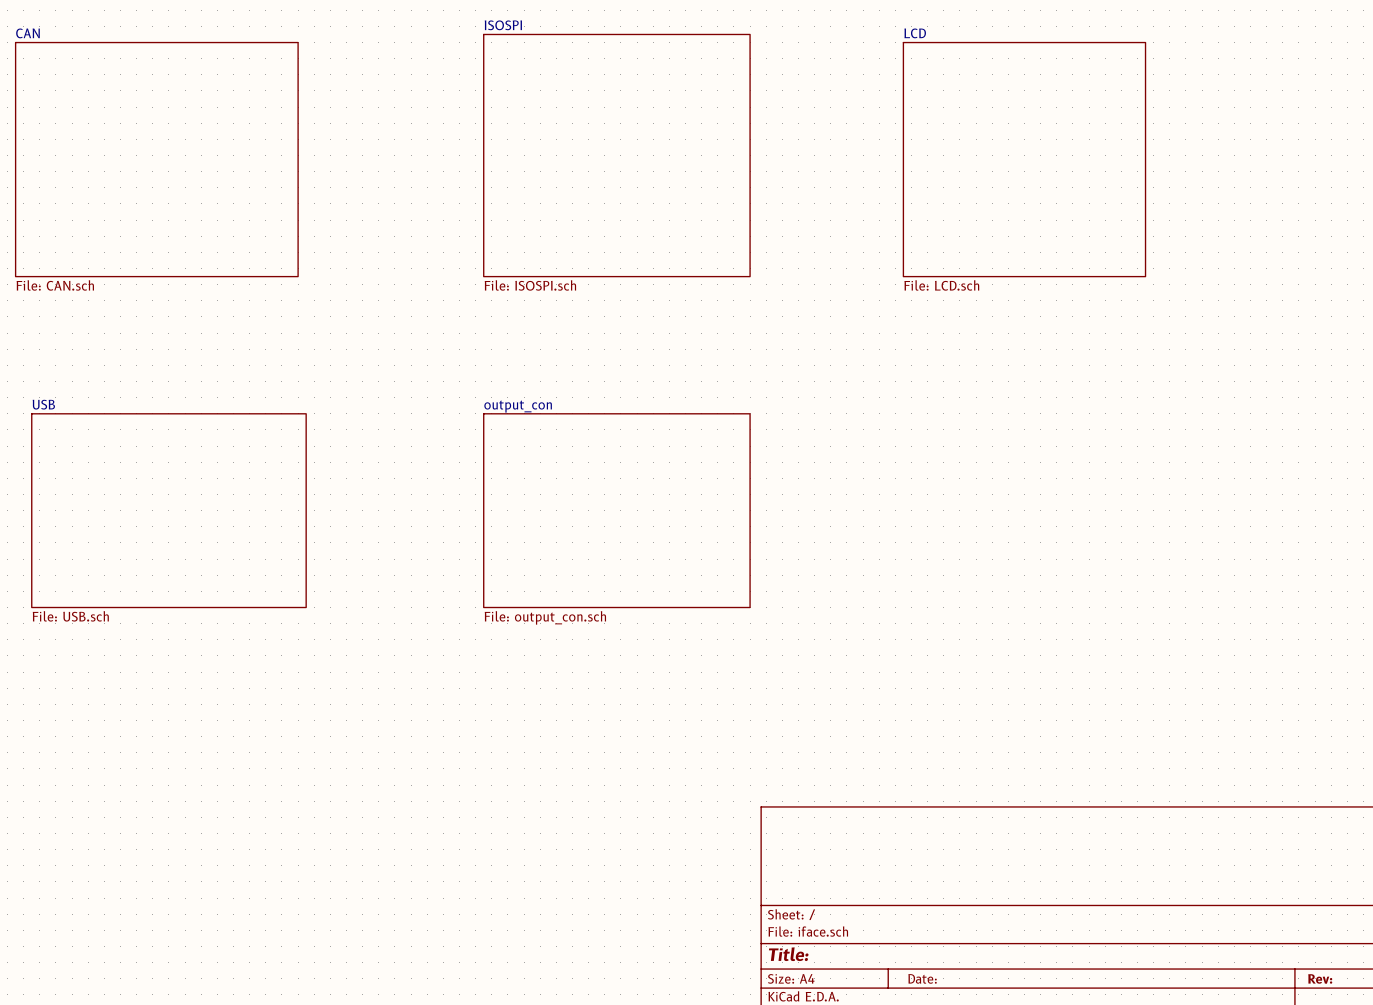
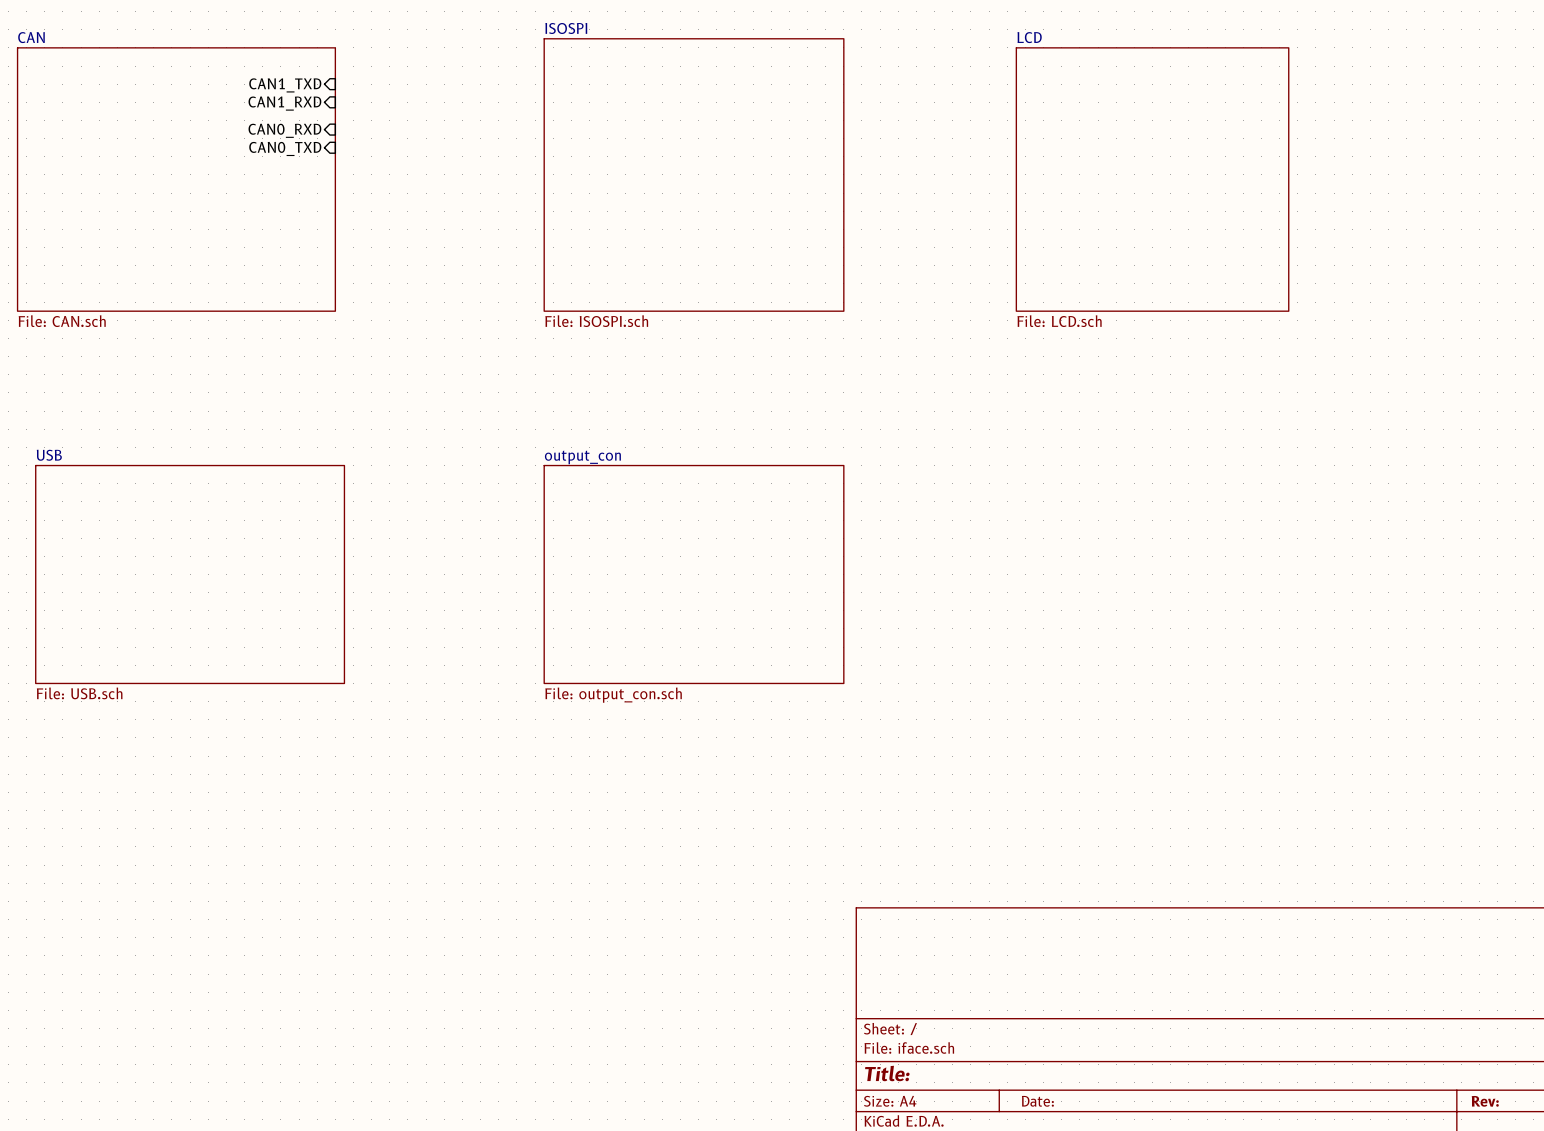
sheet pin: none -> CAN1_TXD (285, 85)
sheet pin: none -> CAN1_RXD (284, 103)
sheet pin: none -> CAN0_RXD (284, 130)
sheet pin: none -> CAN0_TXD (285, 148)

